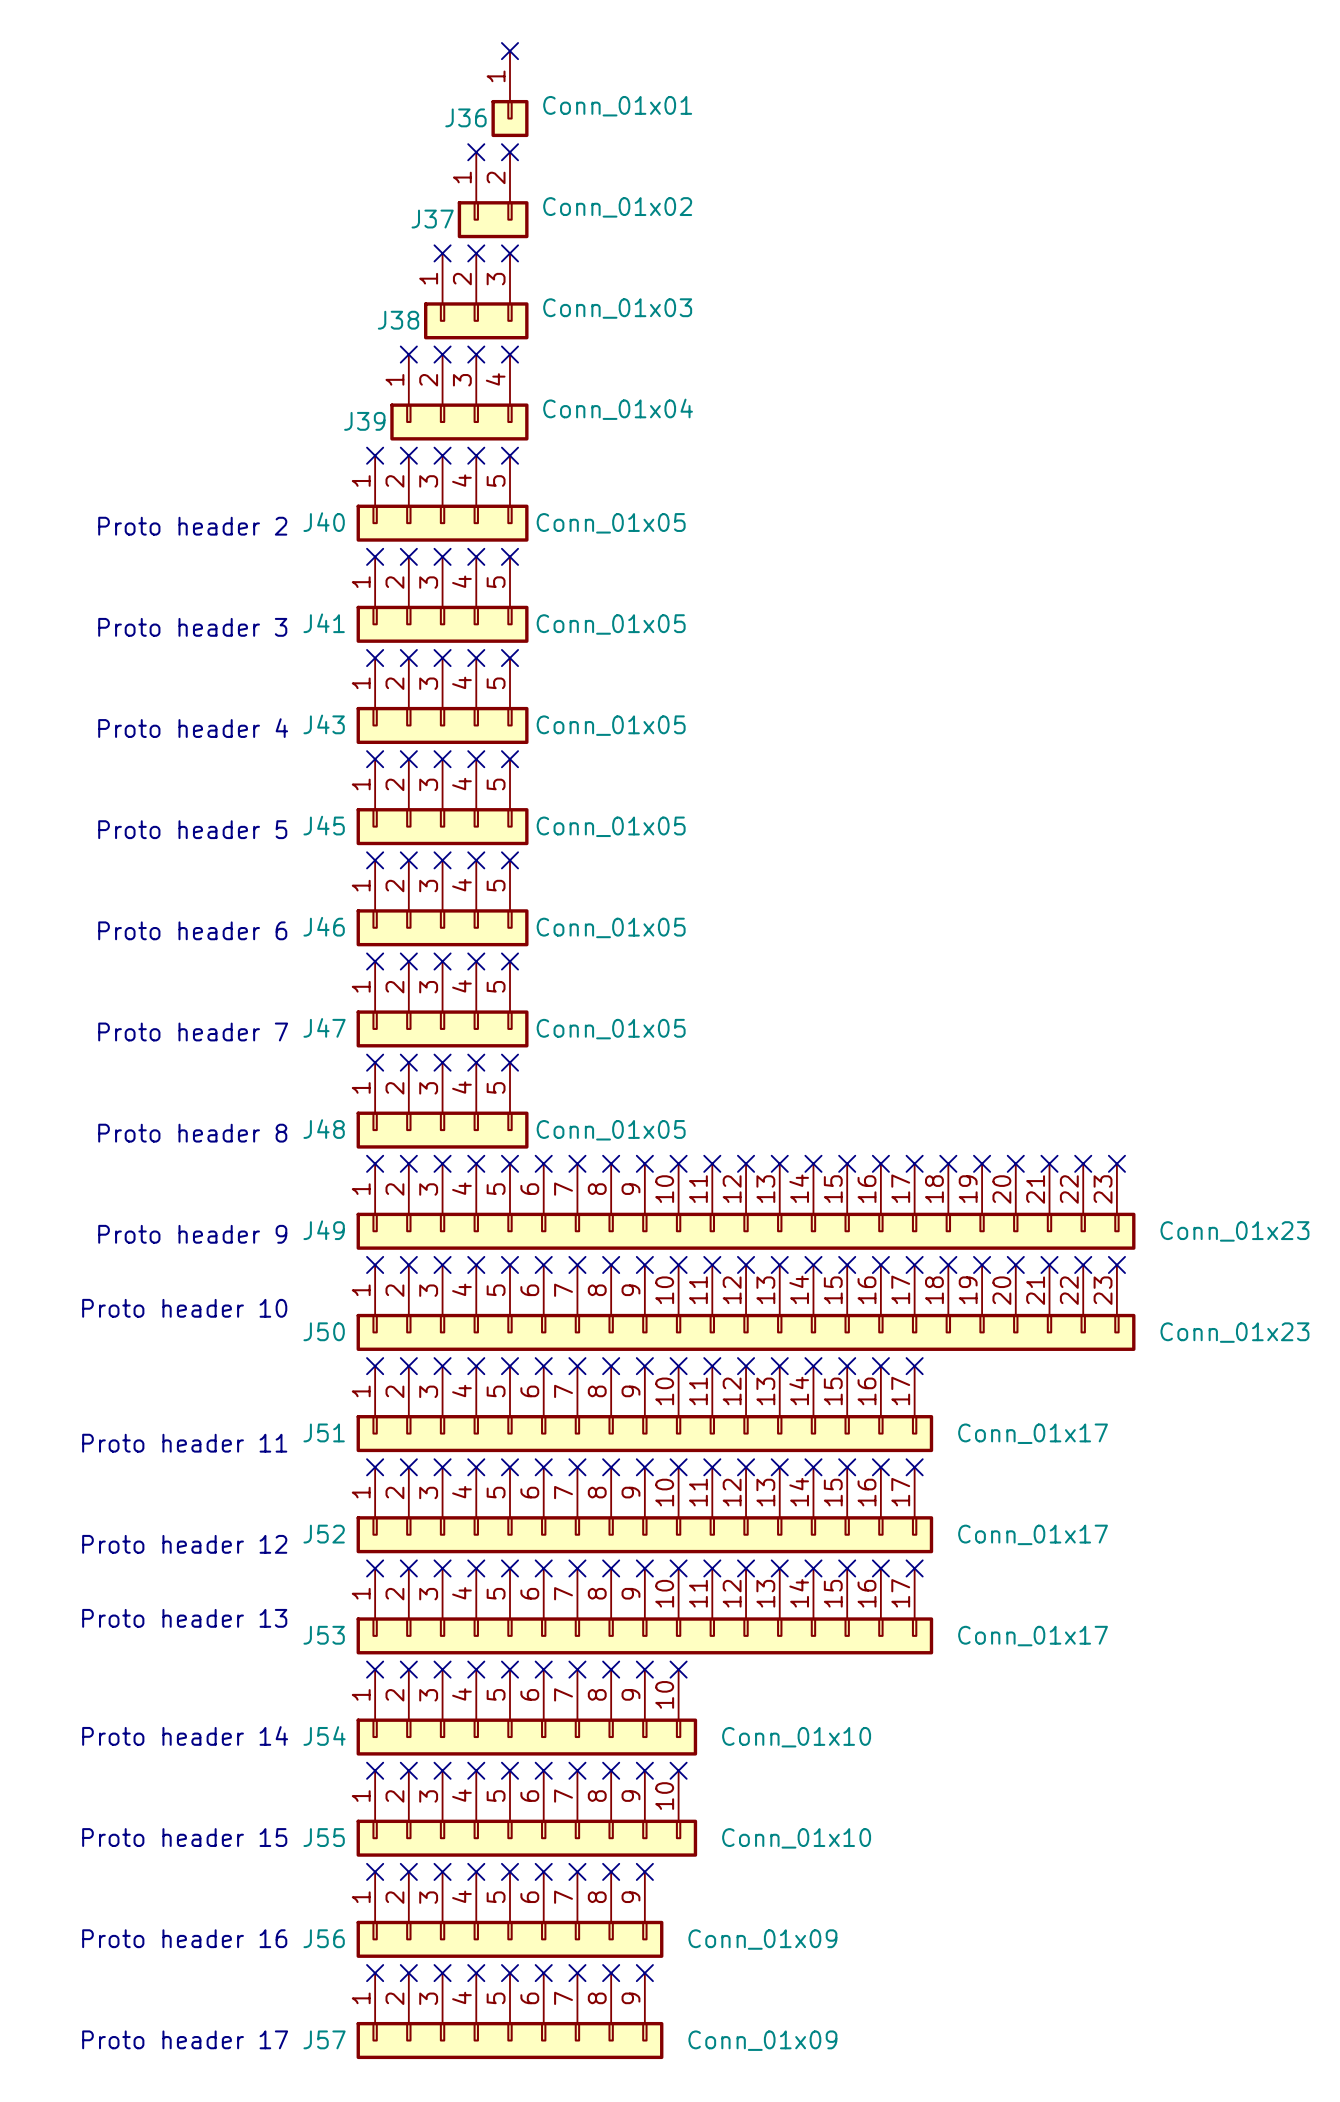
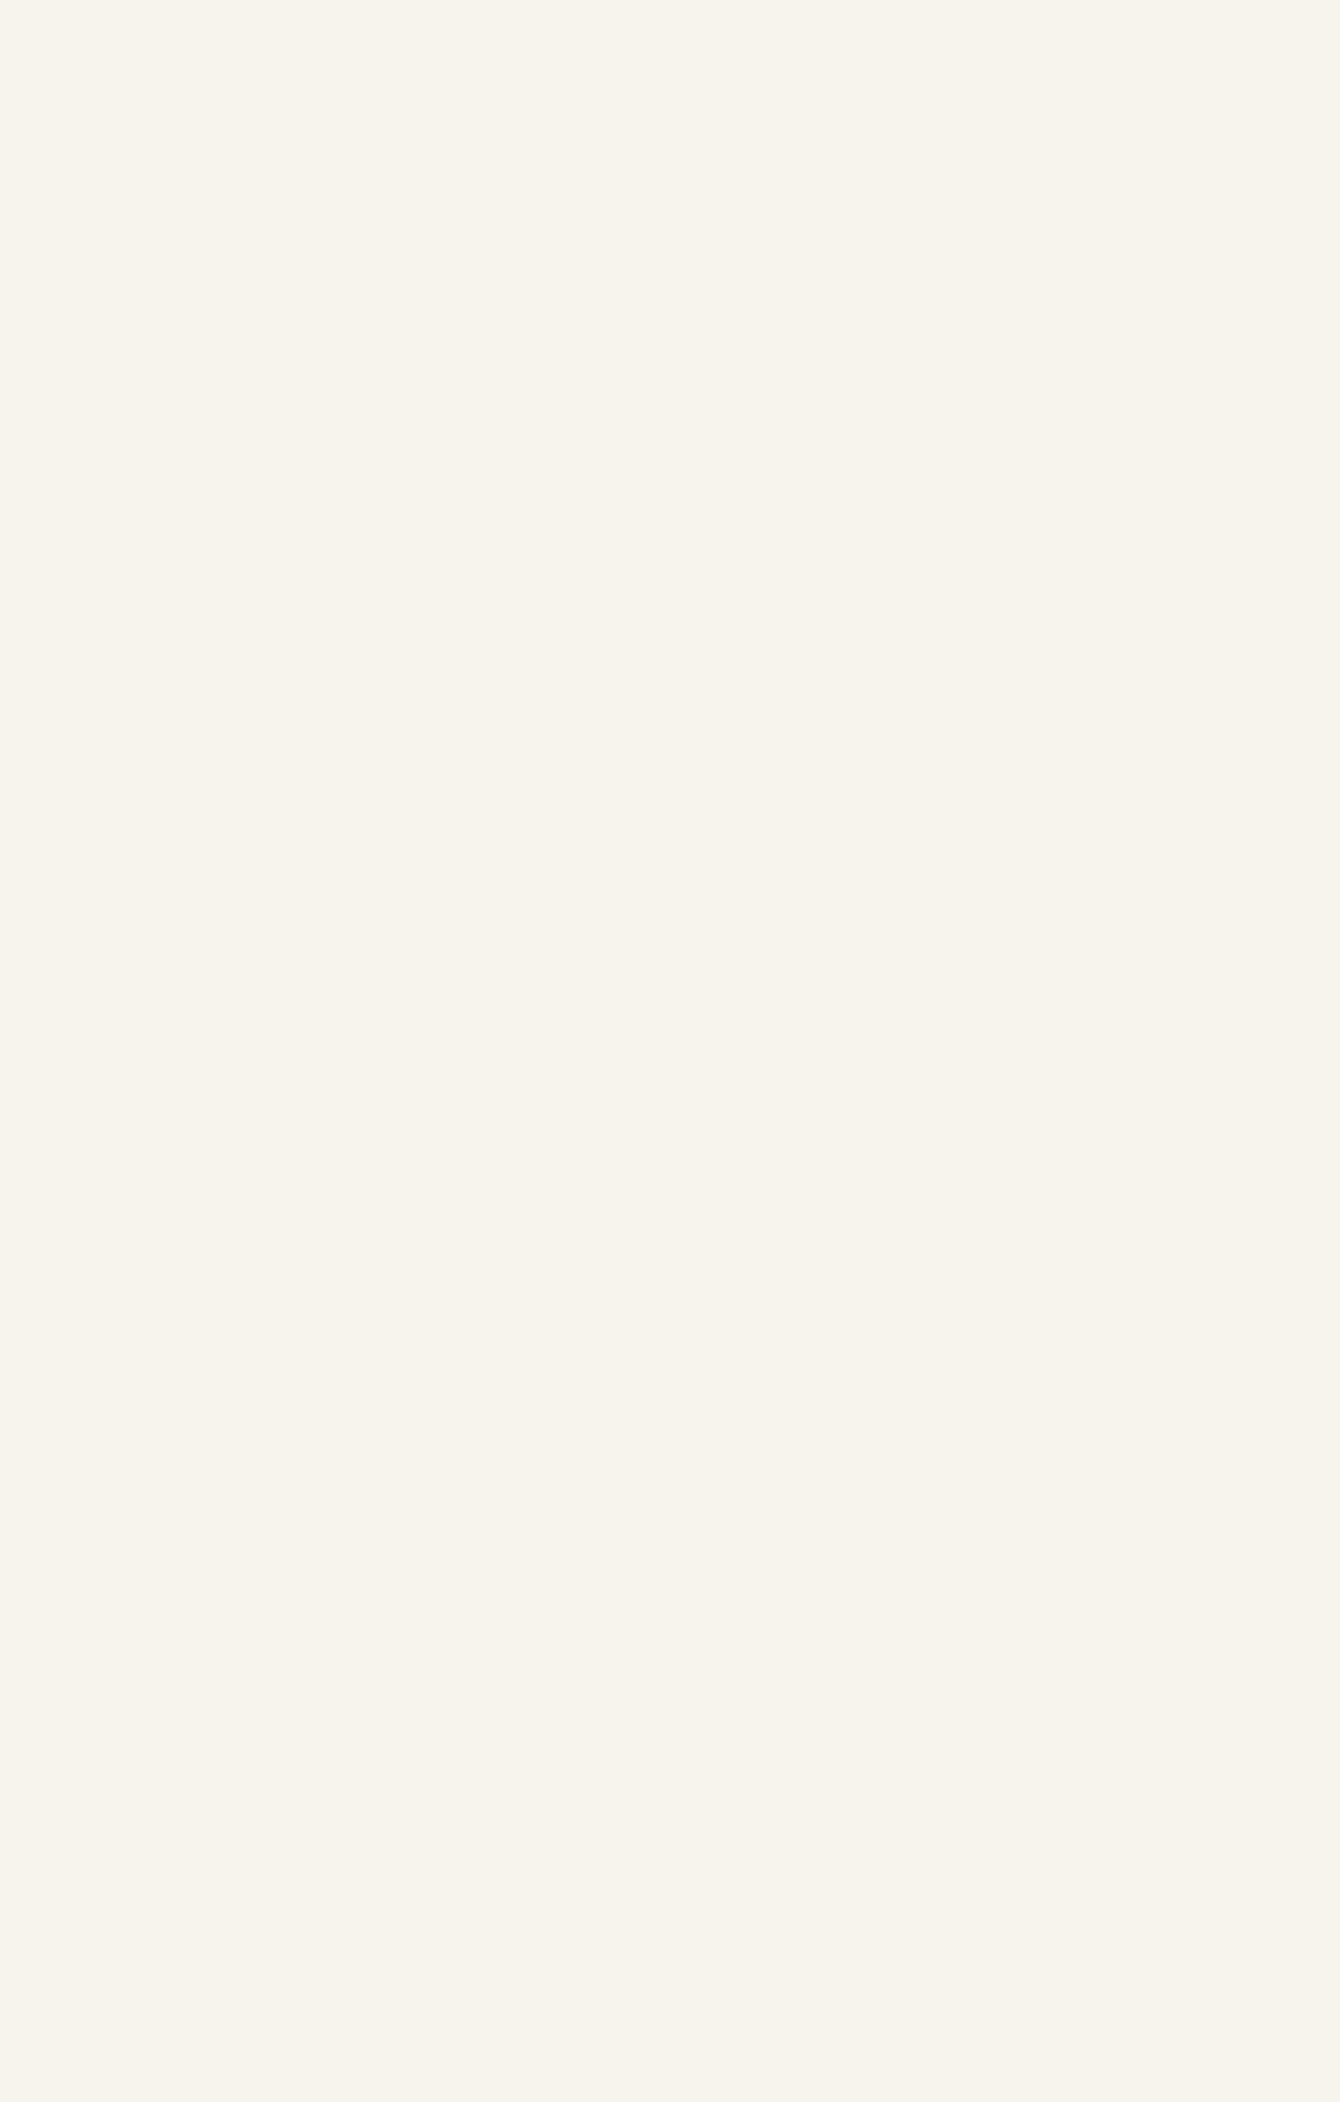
no-connect mark: (509, 51) -> none
J36: Conn_01x01 (509, 94) -> none
no-connect mark: (476, 152) -> none
no-connect mark: (509, 152) -> none
J37: Conn_01x02 (493, 195) -> none
no-connect mark: (442, 253) -> none
no-connect mark: (476, 253) -> none
no-connect mark: (509, 253) -> none
J38: Conn_01x03 (476, 296) -> none
no-connect mark: (408, 354) -> none
no-connect mark: (442, 354) -> none
no-connect mark: (476, 354) -> none
no-connect mark: (509, 354) -> none
J39: Conn_01x04 (459, 397) -> none
no-connect mark: (375, 455) -> none
no-connect mark: (408, 455) -> none
no-connect mark: (442, 455) -> none
no-connect mark: (476, 455) -> none
no-connect mark: (509, 455) -> none
J40: Conn_01x05 (442, 498) -> none
text: Proto header 2 (192, 526) -> none
no-connect mark: (375, 556) -> none
no-connect mark: (408, 556) -> none
no-connect mark: (442, 556) -> none
no-connect mark: (476, 556) -> none
no-connect mark: (509, 556) -> none
J41: Conn_01x05 (442, 599) -> none
text: Proto header 3 (192, 627) -> none
no-connect mark: (375, 658) -> none
no-connect mark: (408, 658) -> none
no-connect mark: (442, 658) -> none
no-connect mark: (476, 658) -> none
no-connect mark: (509, 658) -> none
J43: Conn_01x05 (442, 701) -> none
text: Proto header 4 (193, 728) -> none
no-connect mark: (375, 759) -> none
no-connect mark: (408, 759) -> none
no-connect mark: (442, 759) -> none
no-connect mark: (476, 759) -> none
no-connect mark: (509, 759) -> none
J45: Conn_01x05 (442, 802) -> none
text: Proto header 5 (192, 829) -> none
no-connect mark: (375, 860) -> none
no-connect mark: (408, 860) -> none
no-connect mark: (442, 860) -> none
no-connect mark: (476, 860) -> none
no-connect mark: (509, 860) -> none
J46: Conn_01x05 (442, 903) -> none
text: Proto header 6 (192, 930) -> none
no-connect mark: (375, 961) -> none
no-connect mark: (408, 961) -> none
no-connect mark: (442, 961) -> none
no-connect mark: (476, 961) -> none
no-connect mark: (509, 961) -> none
J47: Conn_01x05 (442, 1004) -> none
text: Proto header 7 (193, 1031) -> none
no-connect mark: (375, 1062) -> none
no-connect mark: (408, 1062) -> none
no-connect mark: (442, 1062) -> none
no-connect mark: (476, 1062) -> none
no-connect mark: (509, 1062) -> none
J48: Conn_01x05 (442, 1105) -> none
text: Proto header 8 (192, 1133) -> none
no-connect mark: (375, 1163) -> none
no-connect mark: (408, 1163) -> none
no-connect mark: (442, 1163) -> none
no-connect mark: (476, 1163) -> none
no-connect mark: (509, 1163) -> none
no-connect mark: (543, 1163) -> none
no-connect mark: (577, 1163) -> none
no-connect mark: (611, 1163) -> none
no-connect mark: (644, 1163) -> none
no-connect mark: (678, 1163) -> none
no-connect mark: (712, 1163) -> none
no-connect mark: (746, 1163) -> none
no-connect mark: (779, 1163) -> none
no-connect mark: (813, 1163) -> none
no-connect mark: (847, 1163) -> none
no-connect mark: (880, 1163) -> none
no-connect mark: (914, 1163) -> none
no-connect mark: (948, 1163) -> none
no-connect mark: (982, 1163) -> none
no-connect mark: (1015, 1163) -> none
no-connect mark: (1049, 1163) -> none
no-connect mark: (1083, 1163) -> none
no-connect mark: (1116, 1163) -> none
J49: Conn_01x23 (746, 1206) -> none
text: Proto header 9 (192, 1234) -> none
no-connect mark: (375, 1264) -> none
no-connect mark: (408, 1264) -> none
no-connect mark: (442, 1264) -> none
no-connect mark: (476, 1264) -> none
no-connect mark: (509, 1264) -> none
no-connect mark: (543, 1264) -> none
no-connect mark: (577, 1264) -> none
no-connect mark: (611, 1264) -> none
no-connect mark: (644, 1264) -> none
no-connect mark: (678, 1264) -> none
no-connect mark: (712, 1264) -> none
no-connect mark: (746, 1264) -> none
no-connect mark: (779, 1264) -> none
no-connect mark: (813, 1264) -> none
no-connect mark: (847, 1264) -> none
no-connect mark: (880, 1264) -> none
no-connect mark: (914, 1264) -> none
no-connect mark: (948, 1264) -> none
no-connect mark: (982, 1264) -> none
no-connect mark: (1015, 1264) -> none
no-connect mark: (1049, 1264) -> none
no-connect mark: (1083, 1264) -> none
no-connect mark: (1116, 1264) -> none
J50: Conn_01x23 (746, 1307) -> none
text: Proto header 10 (184, 1308) -> none
no-connect mark: (375, 1366) -> none
no-connect mark: (408, 1366) -> none
no-connect mark: (442, 1366) -> none
no-connect mark: (476, 1366) -> none
no-connect mark: (509, 1366) -> none
no-connect mark: (543, 1366) -> none
no-connect mark: (577, 1366) -> none
no-connect mark: (611, 1366) -> none
no-connect mark: (644, 1366) -> none
no-connect mark: (678, 1366) -> none
no-connect mark: (712, 1366) -> none
no-connect mark: (746, 1366) -> none
no-connect mark: (779, 1366) -> none
no-connect mark: (813, 1366) -> none
no-connect mark: (847, 1366) -> none
no-connect mark: (880, 1366) -> none
no-connect mark: (914, 1366) -> none
J51: Conn_01x17 (644, 1409) -> none
text: Proto header 11 (184, 1443) -> none
no-connect mark: (375, 1467) -> none
no-connect mark: (408, 1467) -> none
no-connect mark: (442, 1467) -> none
no-connect mark: (476, 1467) -> none
no-connect mark: (509, 1467) -> none
no-connect mark: (543, 1467) -> none
no-connect mark: (577, 1467) -> none
no-connect mark: (611, 1467) -> none
no-connect mark: (644, 1467) -> none
no-connect mark: (678, 1467) -> none
no-connect mark: (712, 1467) -> none
no-connect mark: (746, 1467) -> none
no-connect mark: (779, 1467) -> none
no-connect mark: (813, 1467) -> none
no-connect mark: (847, 1467) -> none
no-connect mark: (880, 1467) -> none
no-connect mark: (914, 1467) -> none
J52: Conn_01x17 (644, 1510) -> none
text: Proto header 12 (184, 1544) -> none
no-connect mark: (375, 1568) -> none
no-connect mark: (408, 1568) -> none
no-connect mark: (442, 1568) -> none
no-connect mark: (476, 1568) -> none
no-connect mark: (509, 1568) -> none
no-connect mark: (543, 1568) -> none
no-connect mark: (577, 1568) -> none
no-connect mark: (611, 1568) -> none
no-connect mark: (644, 1568) -> none
no-connect mark: (678, 1568) -> none
no-connect mark: (712, 1568) -> none
no-connect mark: (746, 1568) -> none
no-connect mark: (779, 1568) -> none
no-connect mark: (813, 1568) -> none
no-connect mark: (847, 1568) -> none
no-connect mark: (880, 1568) -> none
no-connect mark: (914, 1568) -> none
J53: Conn_01x17 (644, 1611) -> none
text: Proto header 13 (184, 1618) -> none
no-connect mark: (375, 1669) -> none
no-connect mark: (408, 1669) -> none
no-connect mark: (442, 1669) -> none
no-connect mark: (476, 1669) -> none
no-connect mark: (509, 1669) -> none
no-connect mark: (543, 1669) -> none
no-connect mark: (577, 1669) -> none
no-connect mark: (611, 1669) -> none
no-connect mark: (644, 1669) -> none
no-connect mark: (678, 1669) -> none
J54: Conn_01x10 (526, 1712) -> none
text: Proto header 14 (185, 1735) -> none
no-connect mark: (375, 1770) -> none
no-connect mark: (408, 1770) -> none
no-connect mark: (442, 1770) -> none
no-connect mark: (476, 1770) -> none
no-connect mark: (509, 1770) -> none
no-connect mark: (543, 1770) -> none
no-connect mark: (577, 1770) -> none
no-connect mark: (611, 1770) -> none
no-connect mark: (644, 1770) -> none
no-connect mark: (678, 1770) -> none
J55: Conn_01x10 (526, 1813) -> none
text: Proto header 15 (184, 1837) -> none
no-connect mark: (375, 1871) -> none
no-connect mark: (408, 1871) -> none
no-connect mark: (442, 1871) -> none
no-connect mark: (476, 1871) -> none
no-connect mark: (509, 1871) -> none
no-connect mark: (543, 1871) -> none
no-connect mark: (577, 1871) -> none
no-connect mark: (611, 1871) -> none
no-connect mark: (644, 1871) -> none
J56: Conn_01x09 (509, 1914) -> none
text: Proto header 16 (184, 1938) -> none
no-connect mark: (375, 1973) -> none
no-connect mark: (408, 1973) -> none
no-connect mark: (442, 1973) -> none
no-connect mark: (476, 1973) -> none
no-connect mark: (509, 1973) -> none
no-connect mark: (543, 1973) -> none
no-connect mark: (577, 1973) -> none
no-connect mark: (611, 1973) -> none
no-connect mark: (644, 1973) -> none
J57: Conn_01x09 (509, 2016) -> none
text: Proto header 17 (185, 2039) -> none

